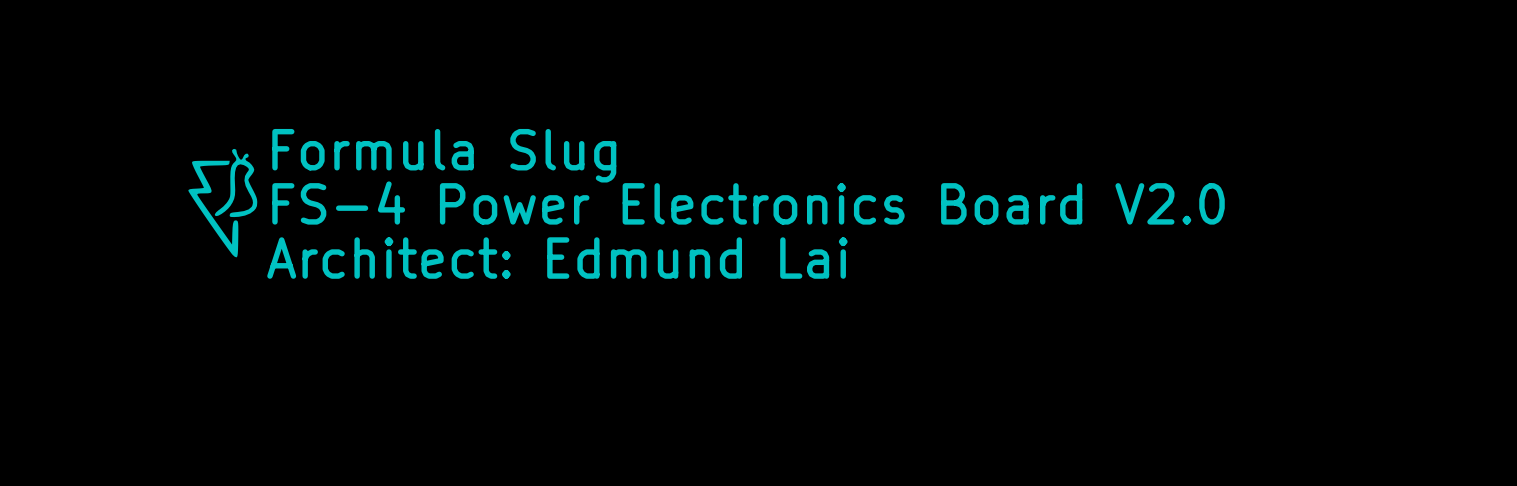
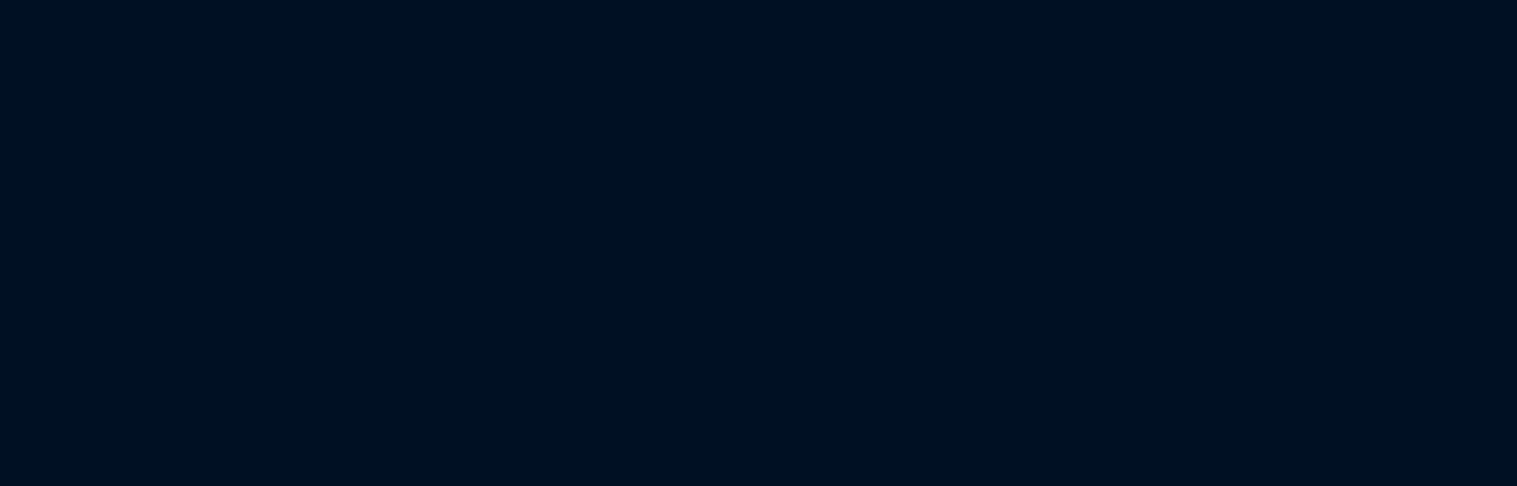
drawing: [188, 148, 258, 258] -> none

